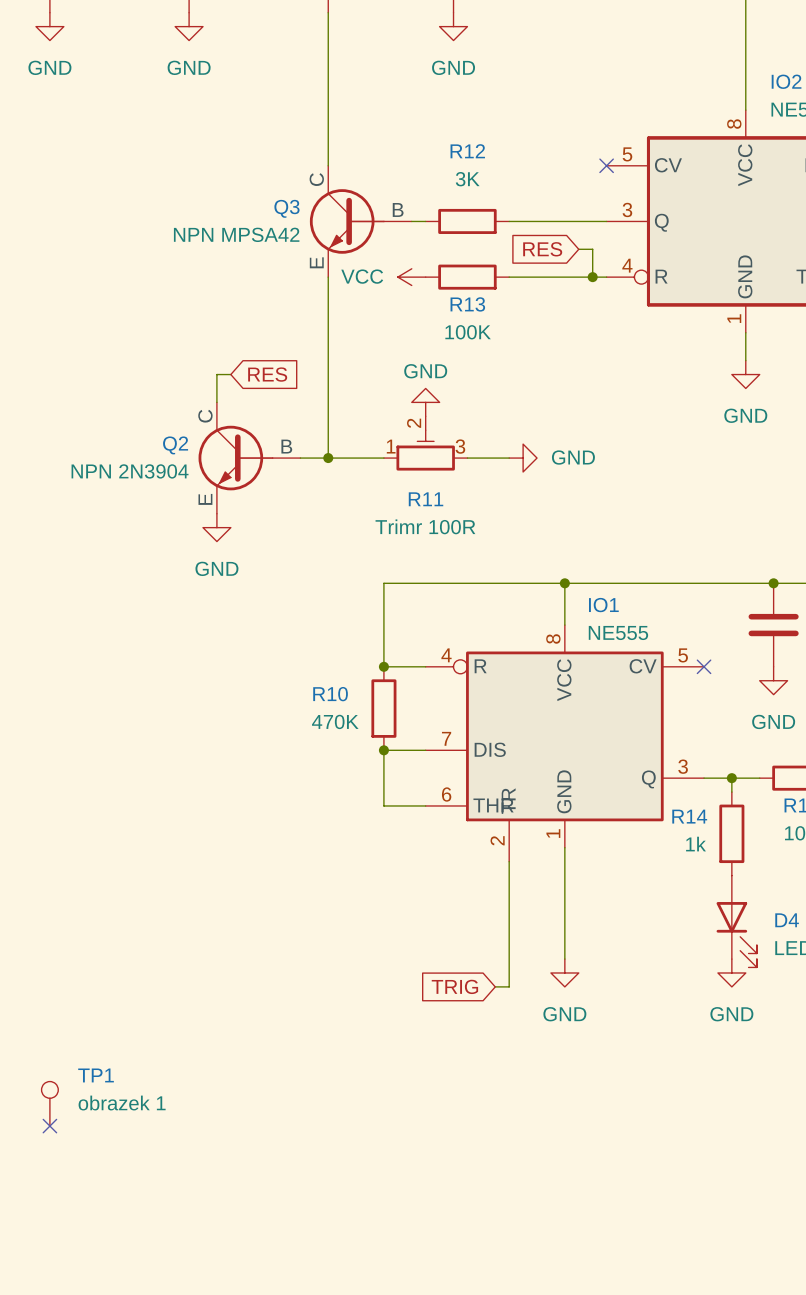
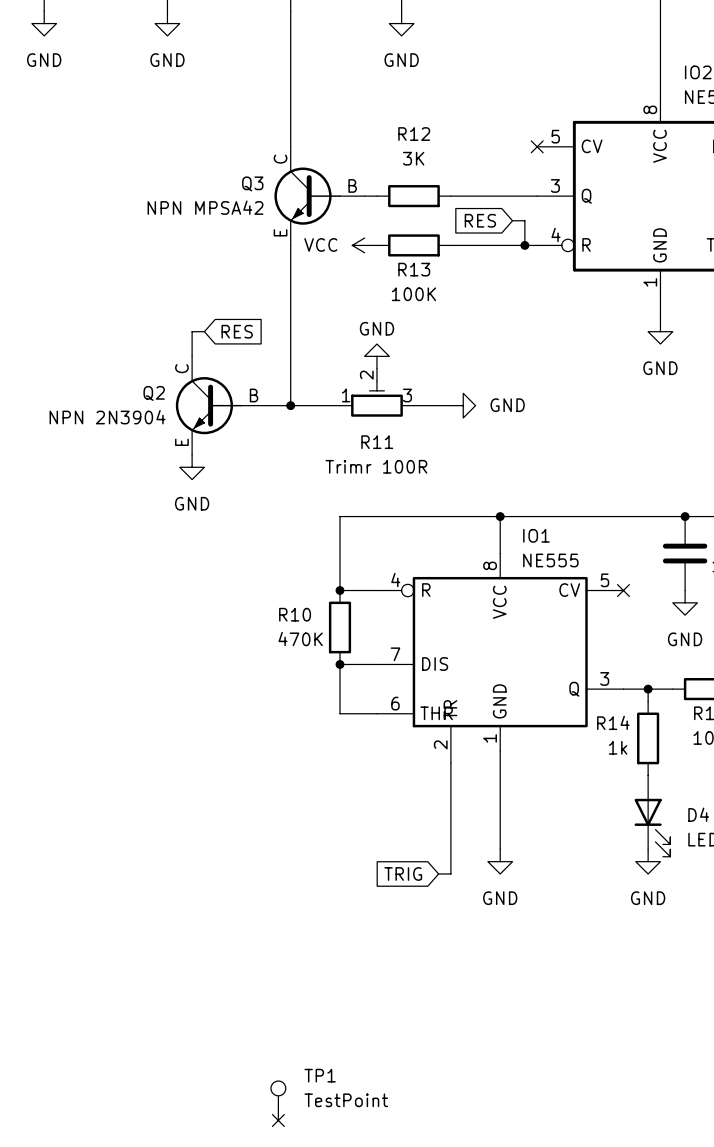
TP1 position: (49, 1103) -> (278, 1100)
TP1 value: obrazek 1 (122, 1103) -> TestPoint (346, 1100)
no-connect mark: (49, 1126) -> none
no-connect mark: none -> (278, 1120)

